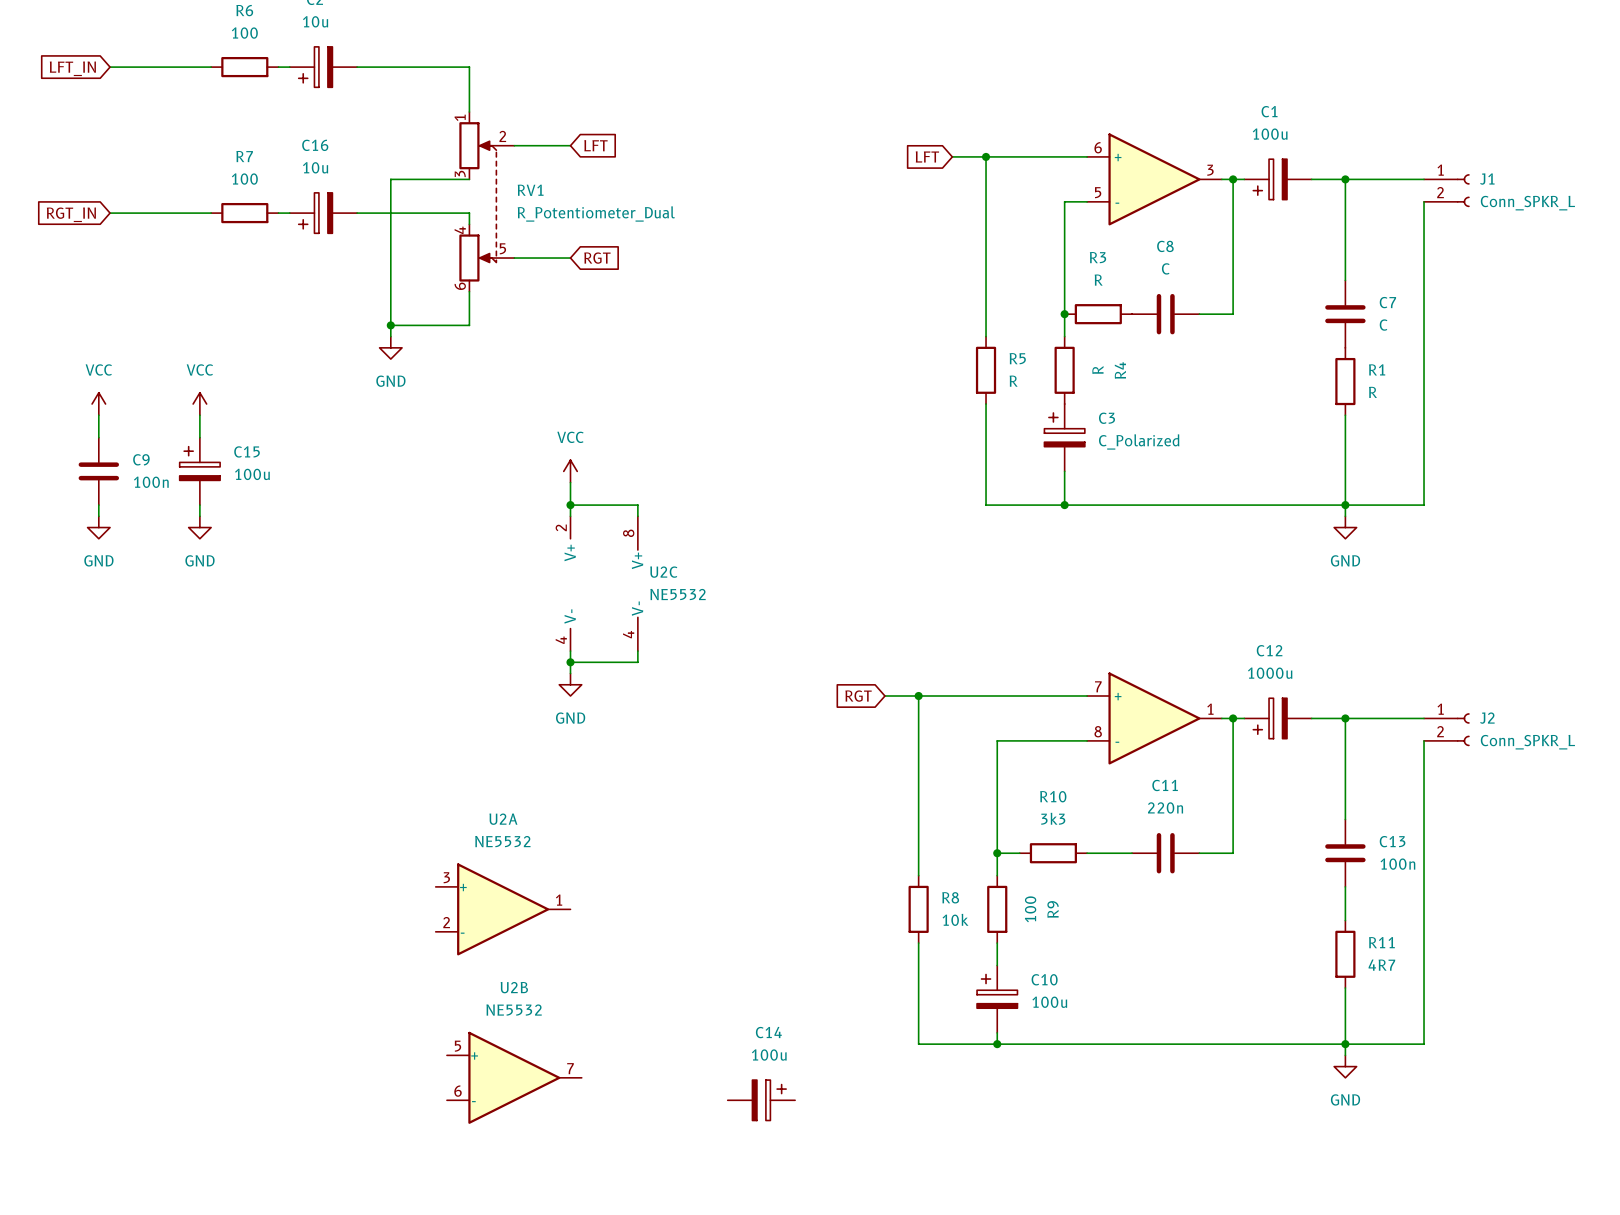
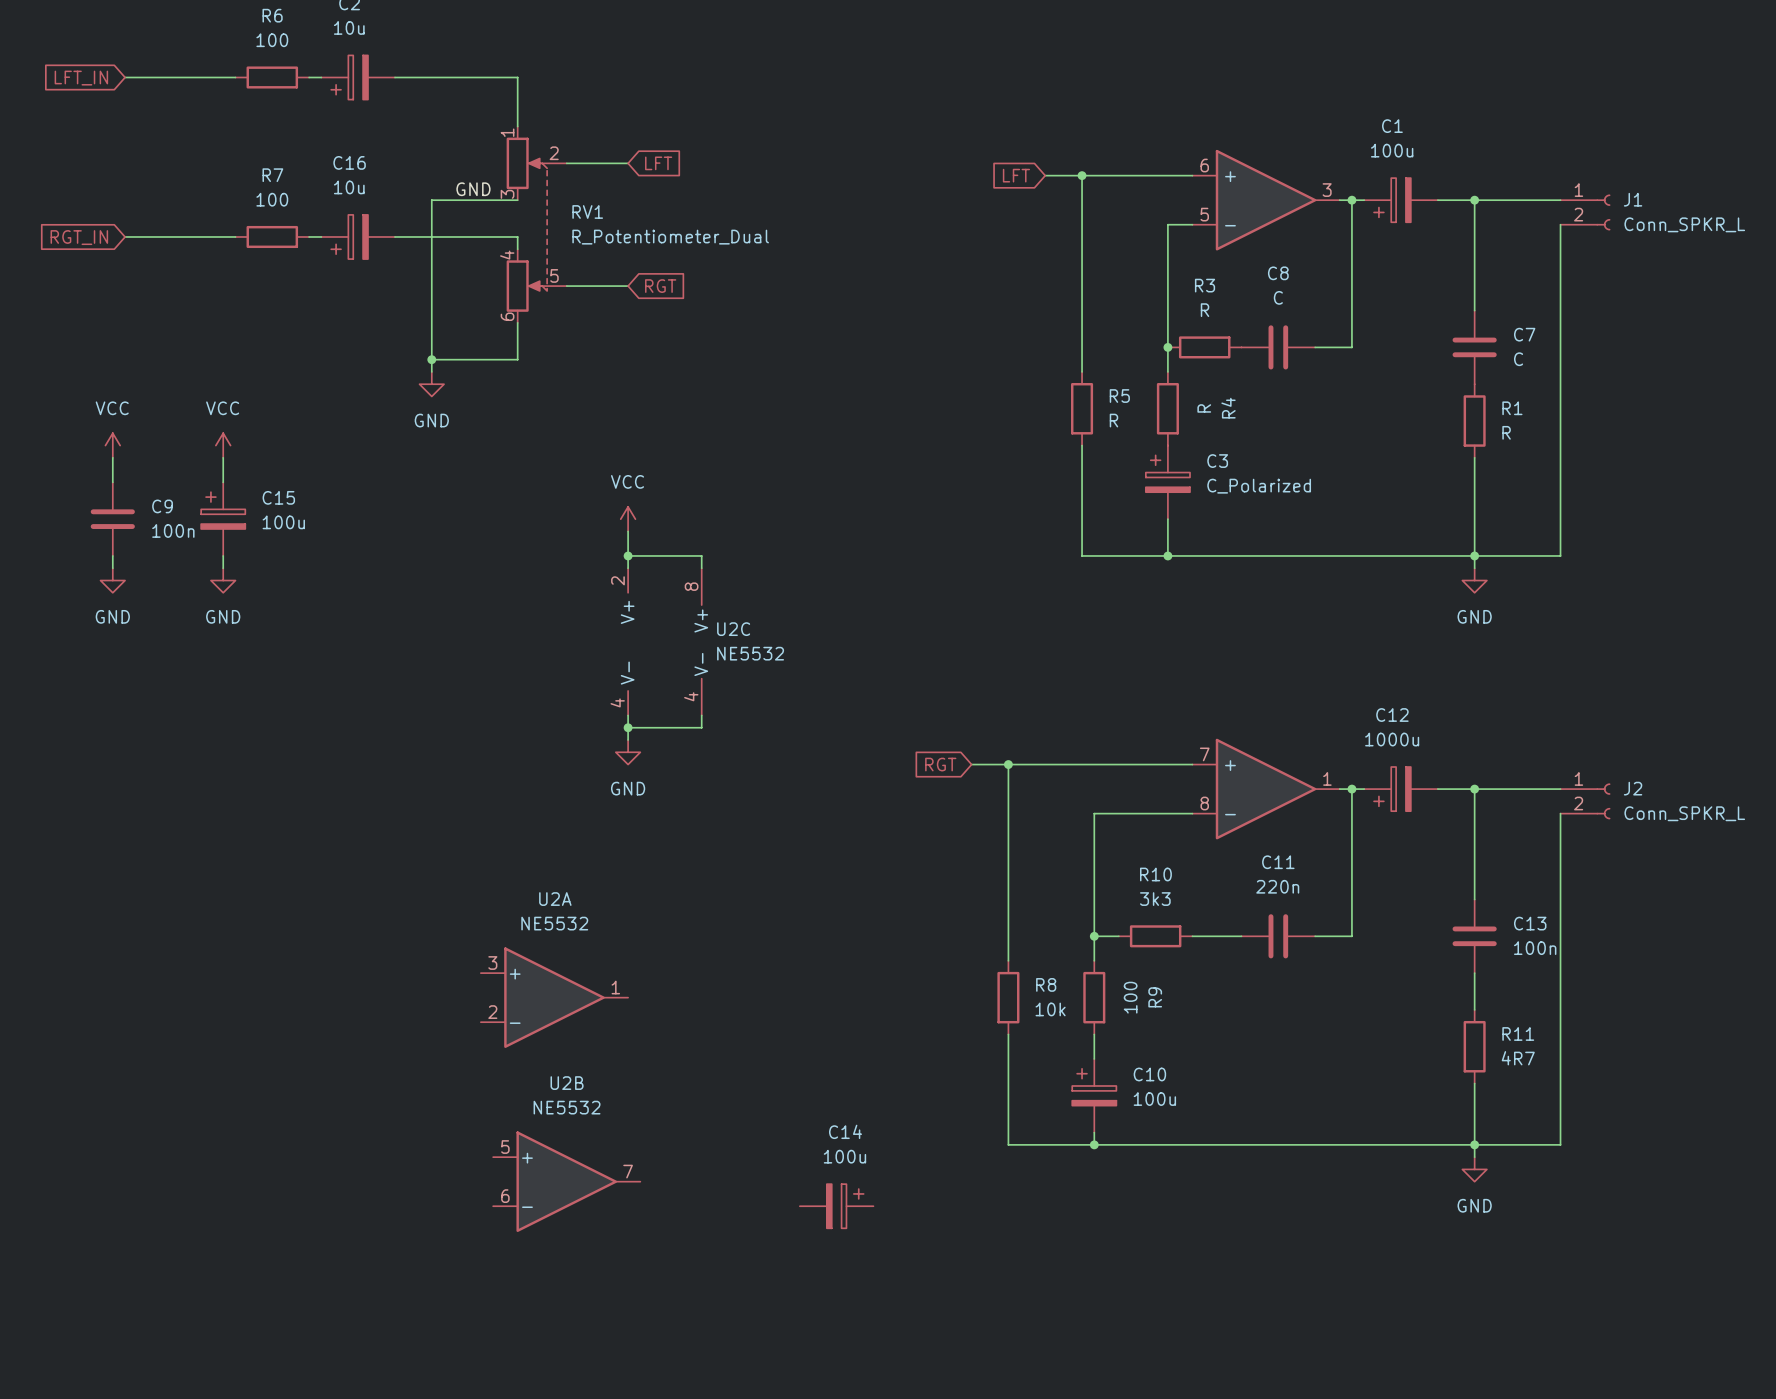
label: none -> GND (473, 189)

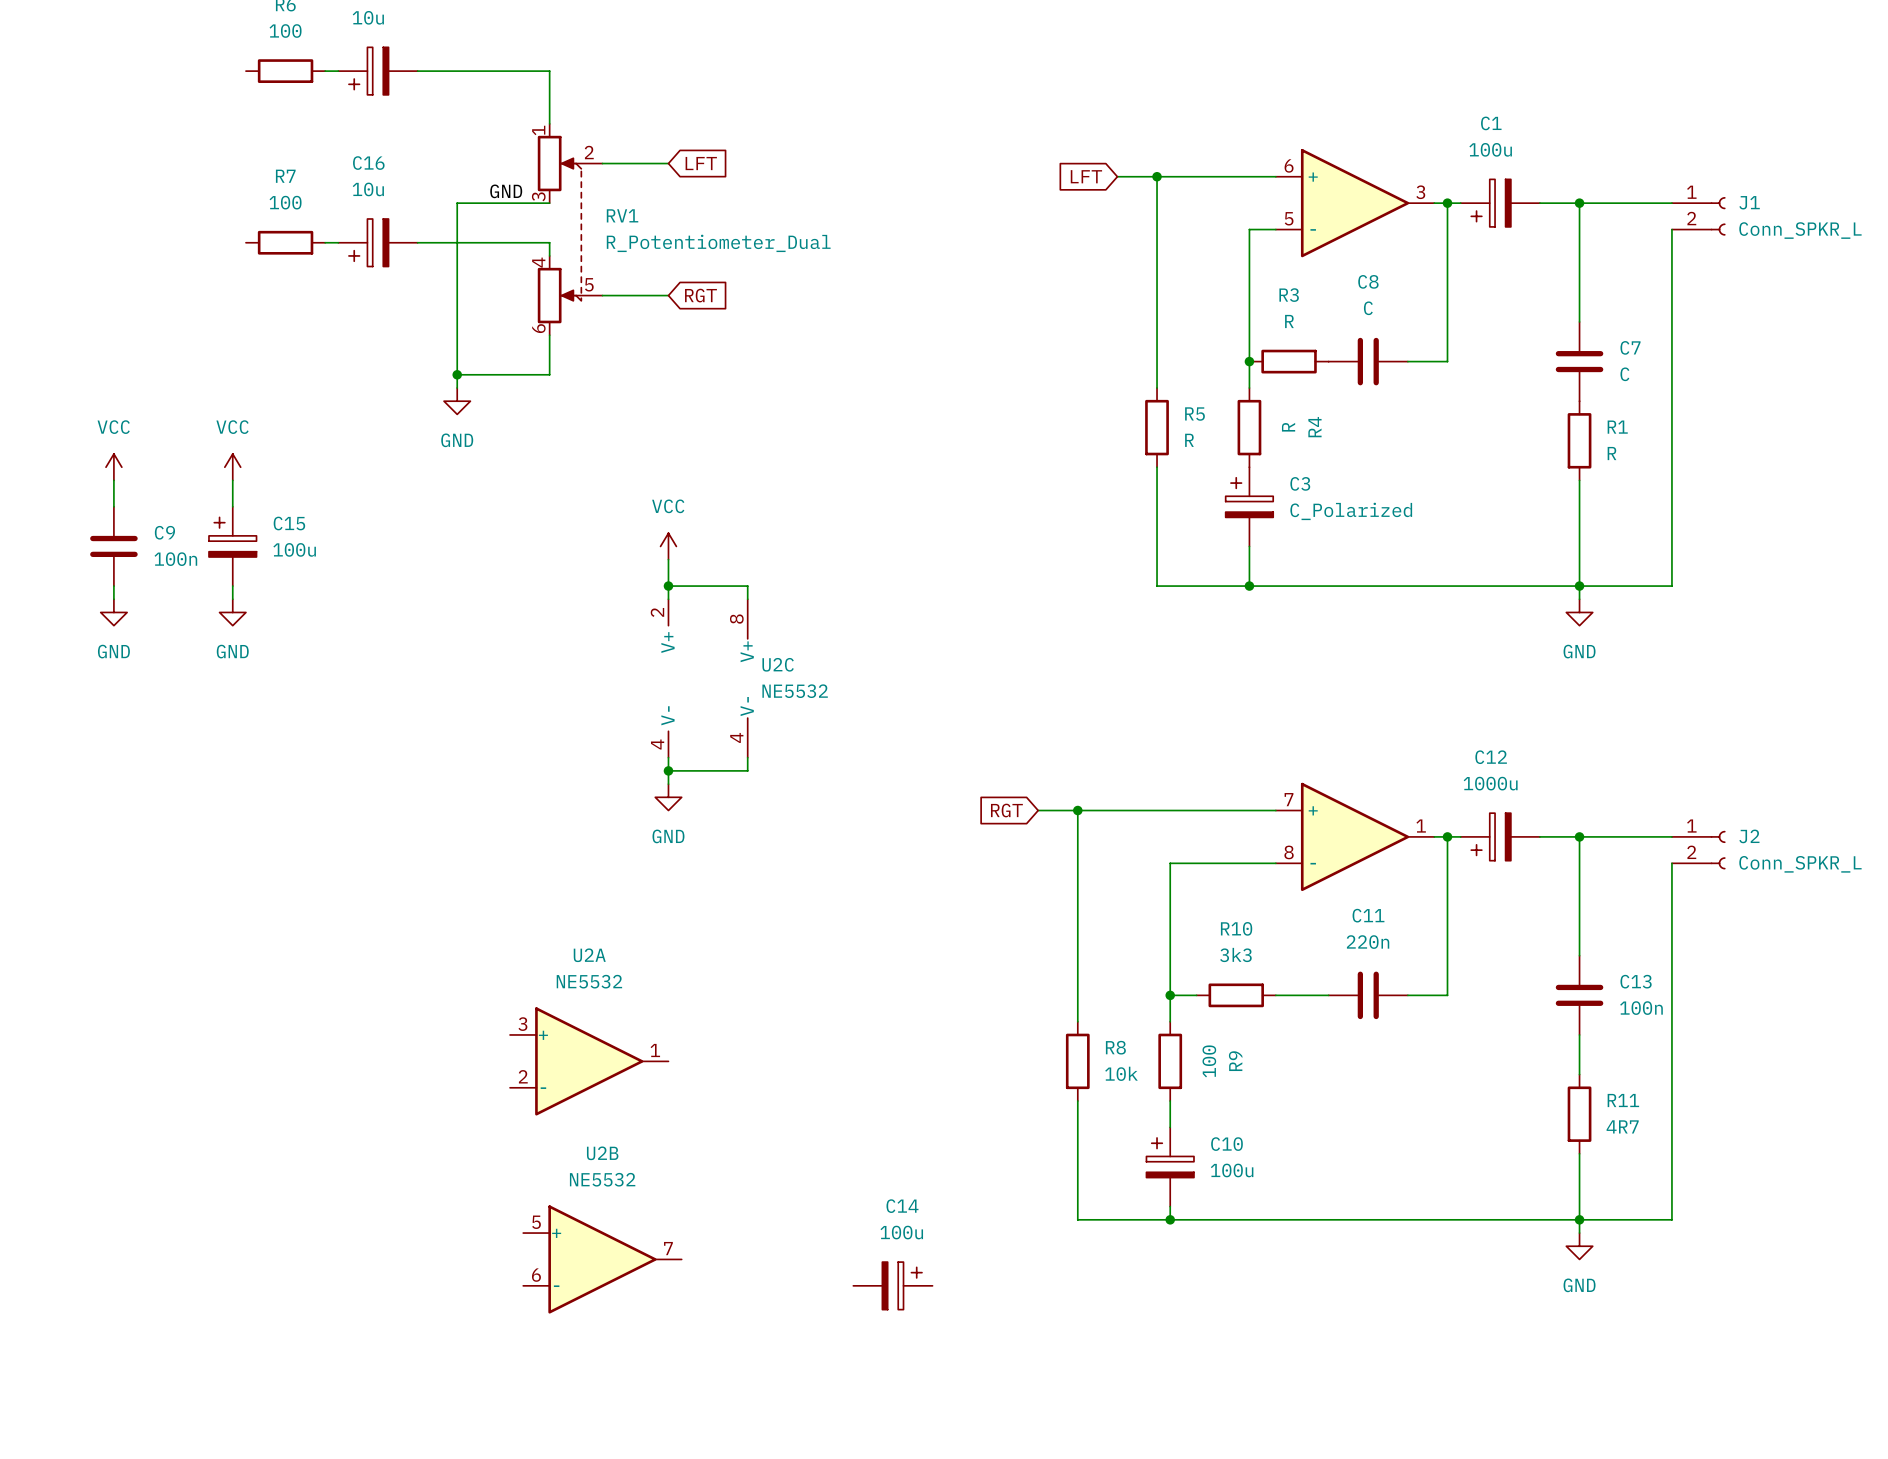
wire: (125, 77) (235, 77) -> none
global label: LFT_IN (81, 78) -> none
wire: (125, 236) (235, 236) -> none
global label: RGT_IN (79, 237) -> none

